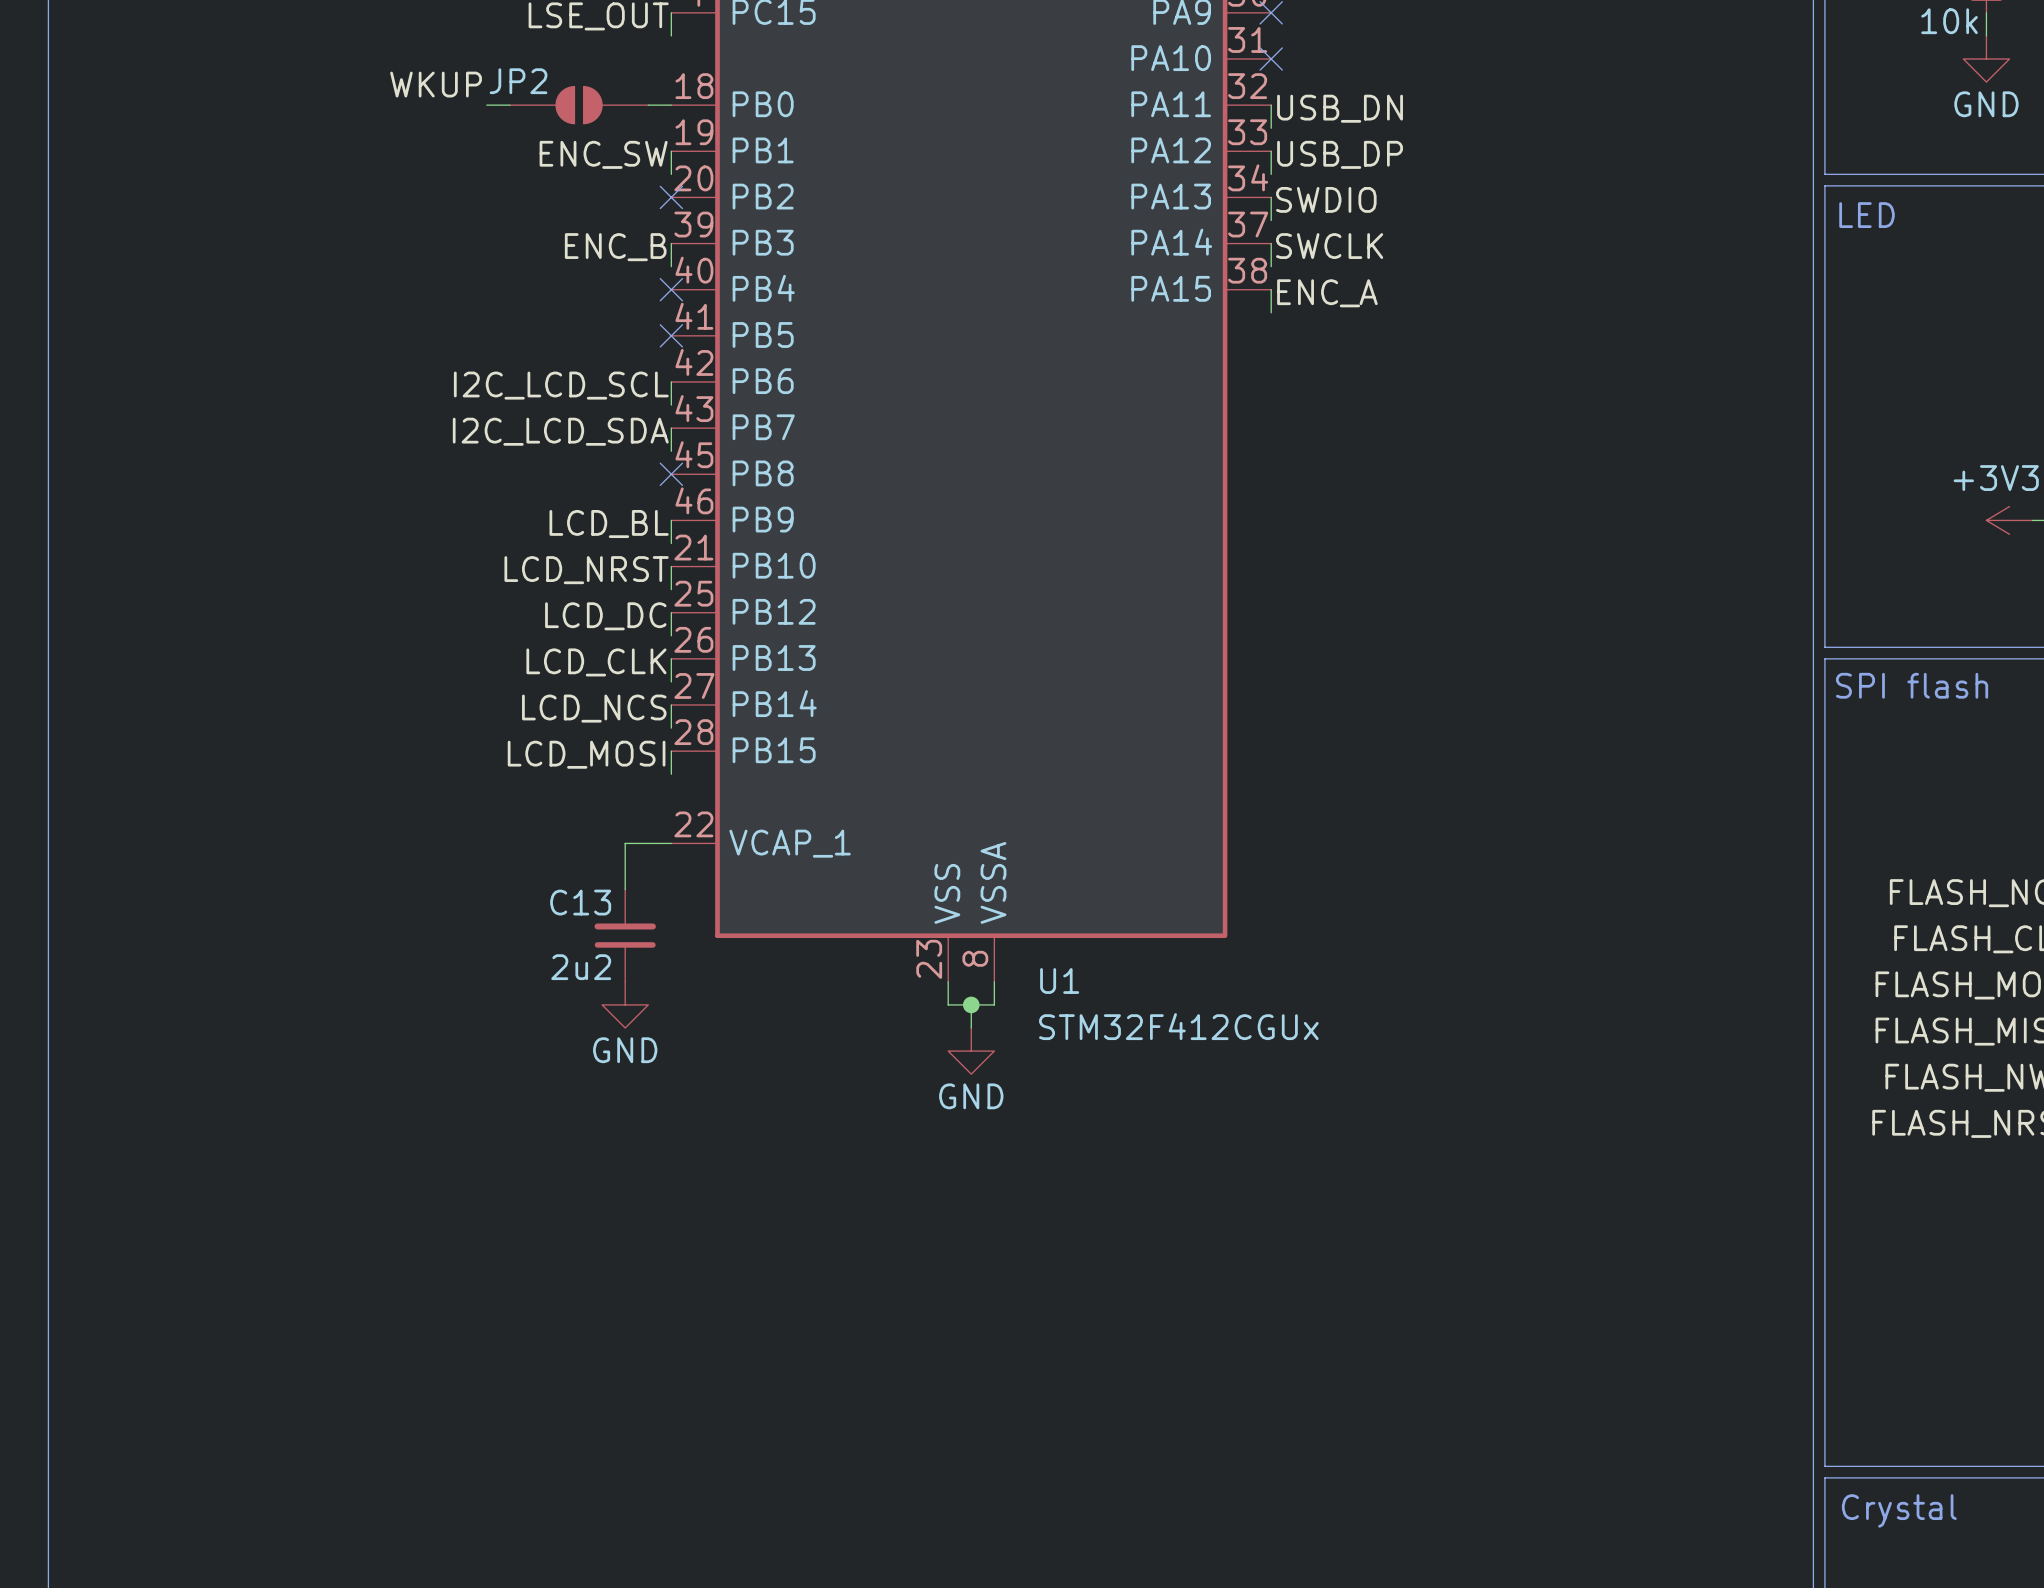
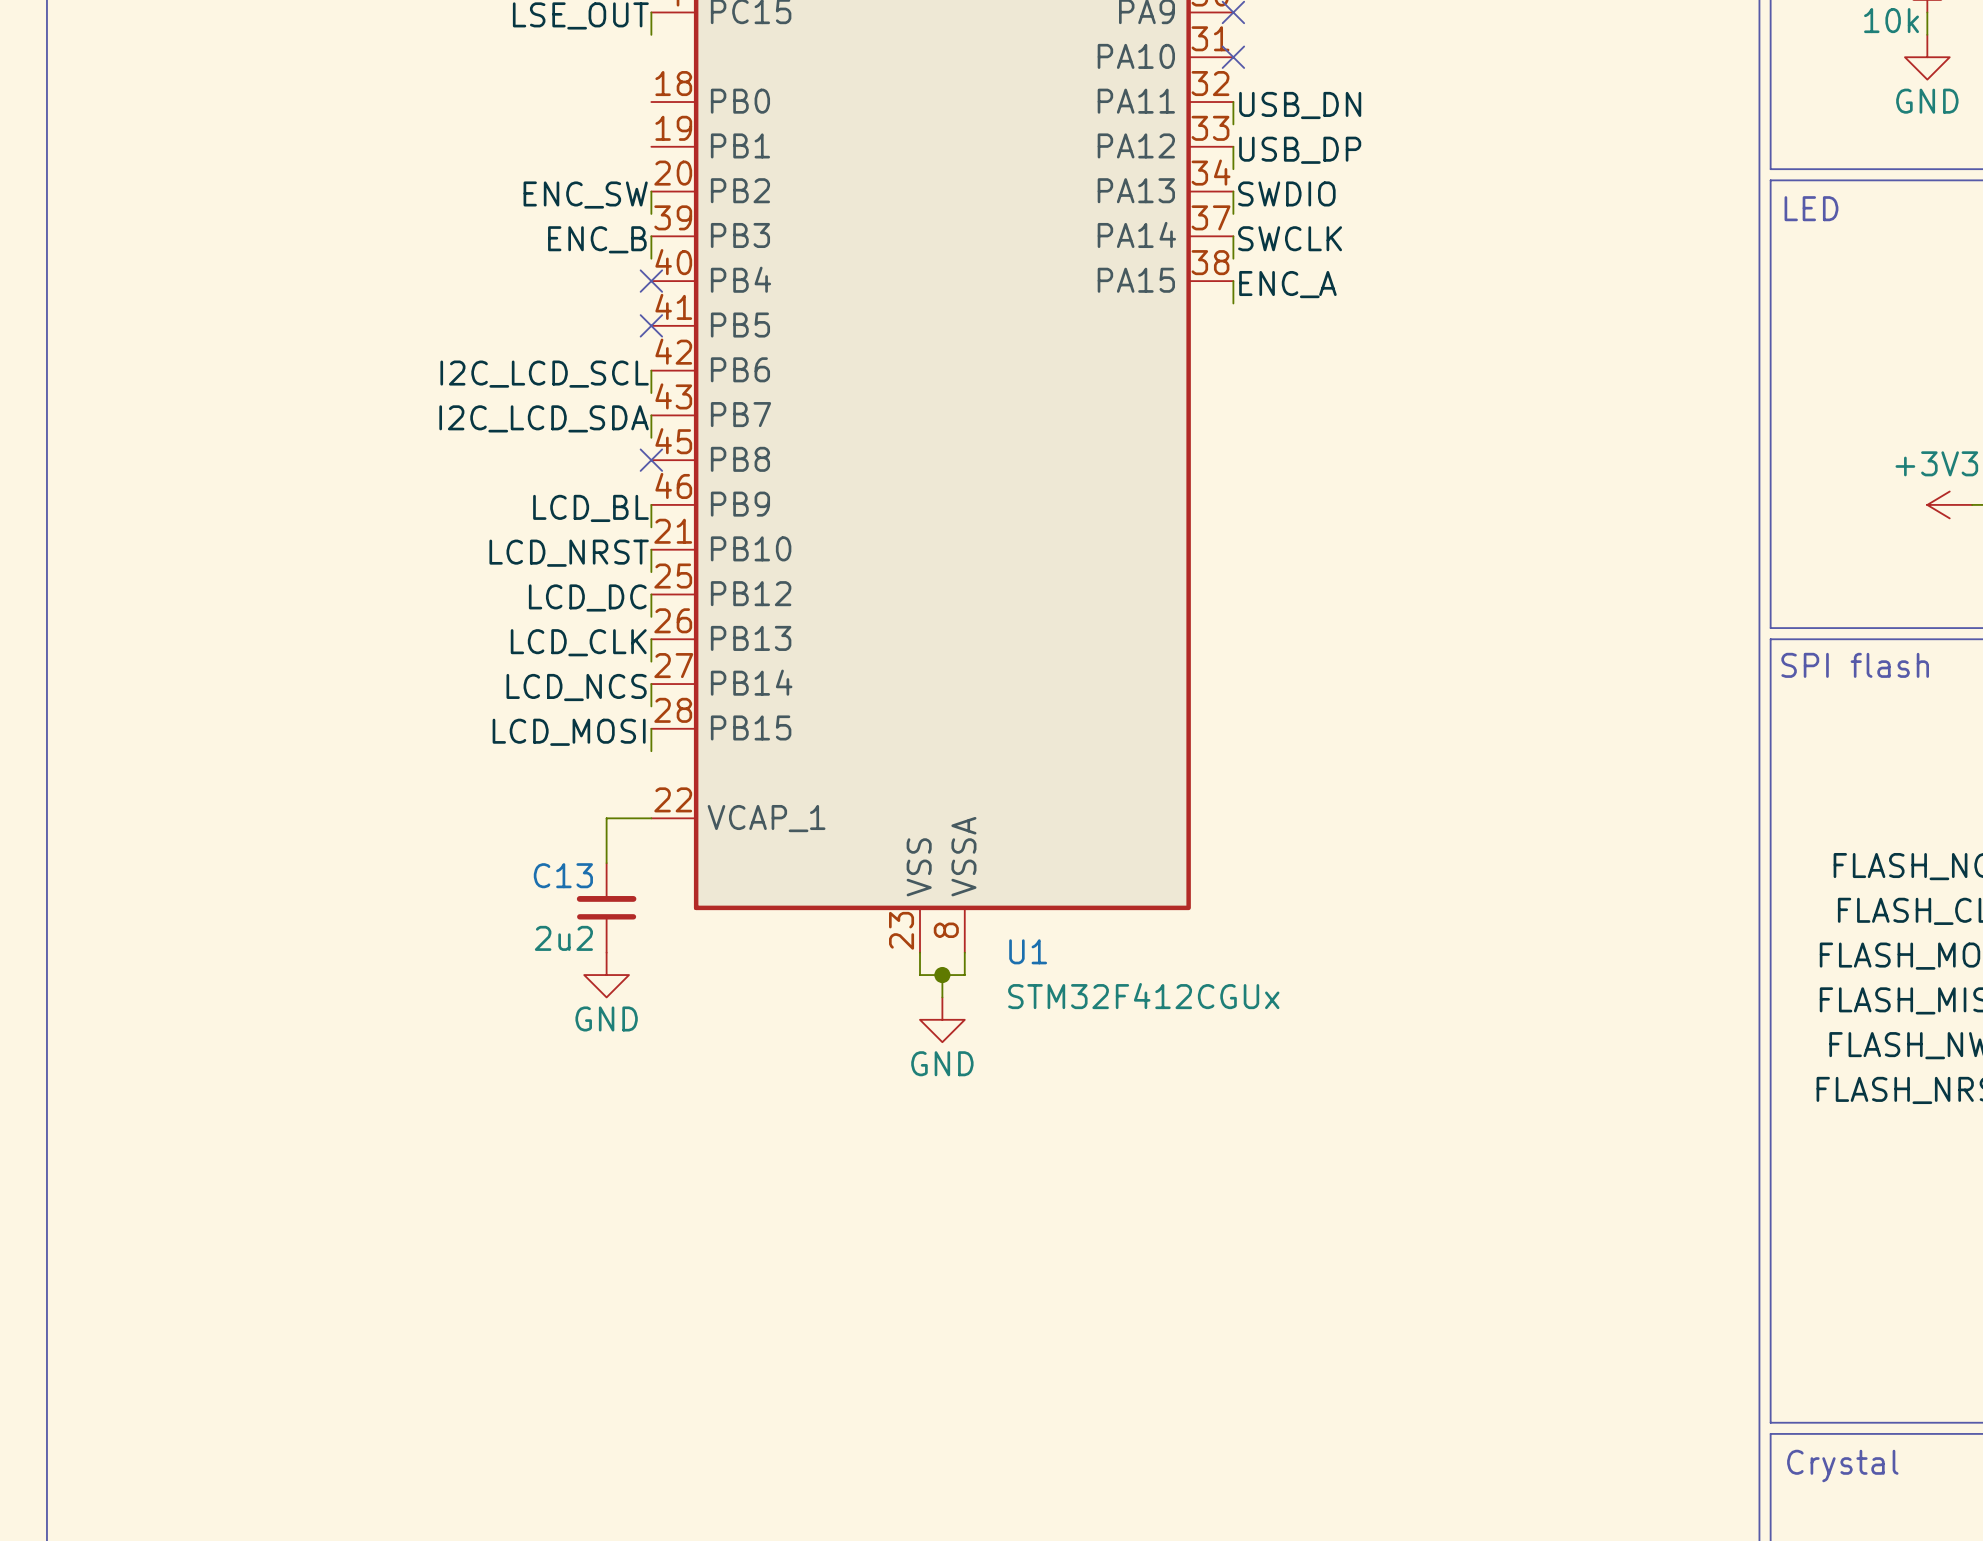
label: WKUP (436, 84) -> none
wire: (486, 105) (509, 105) -> none
JP2: (579, 105) -> none
wire: (648, 105) (671, 105) -> none
wire: (671, 151) (671, 174) -> (651, 191) (651, 213)
label position: ENC_SW (603, 154) -> ENC_SW (585, 195)
no-connect mark: (671, 197) -> none

